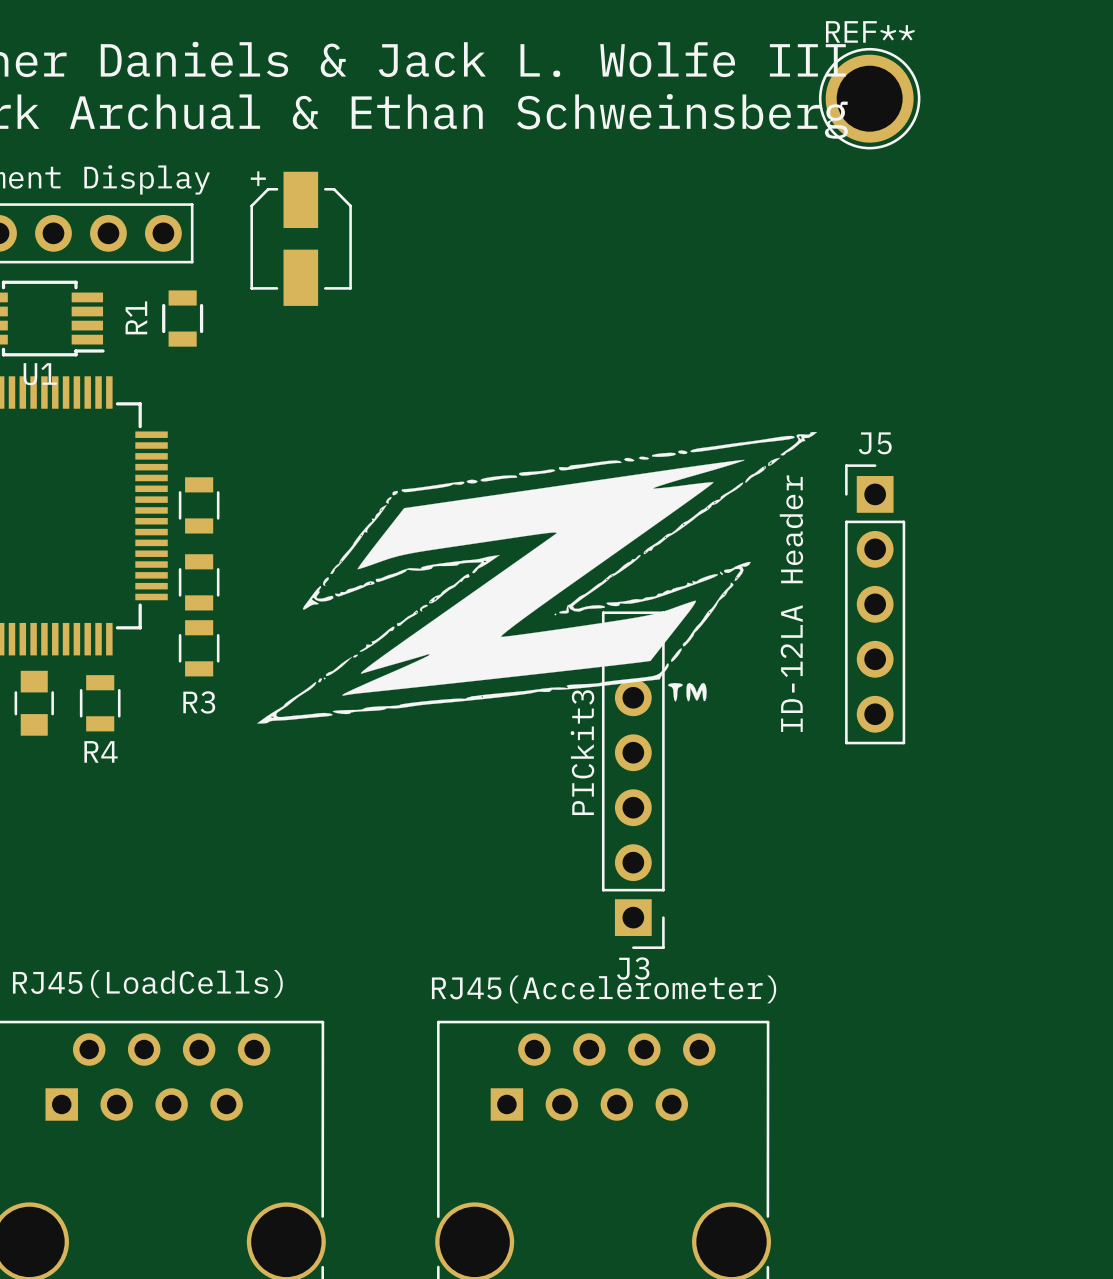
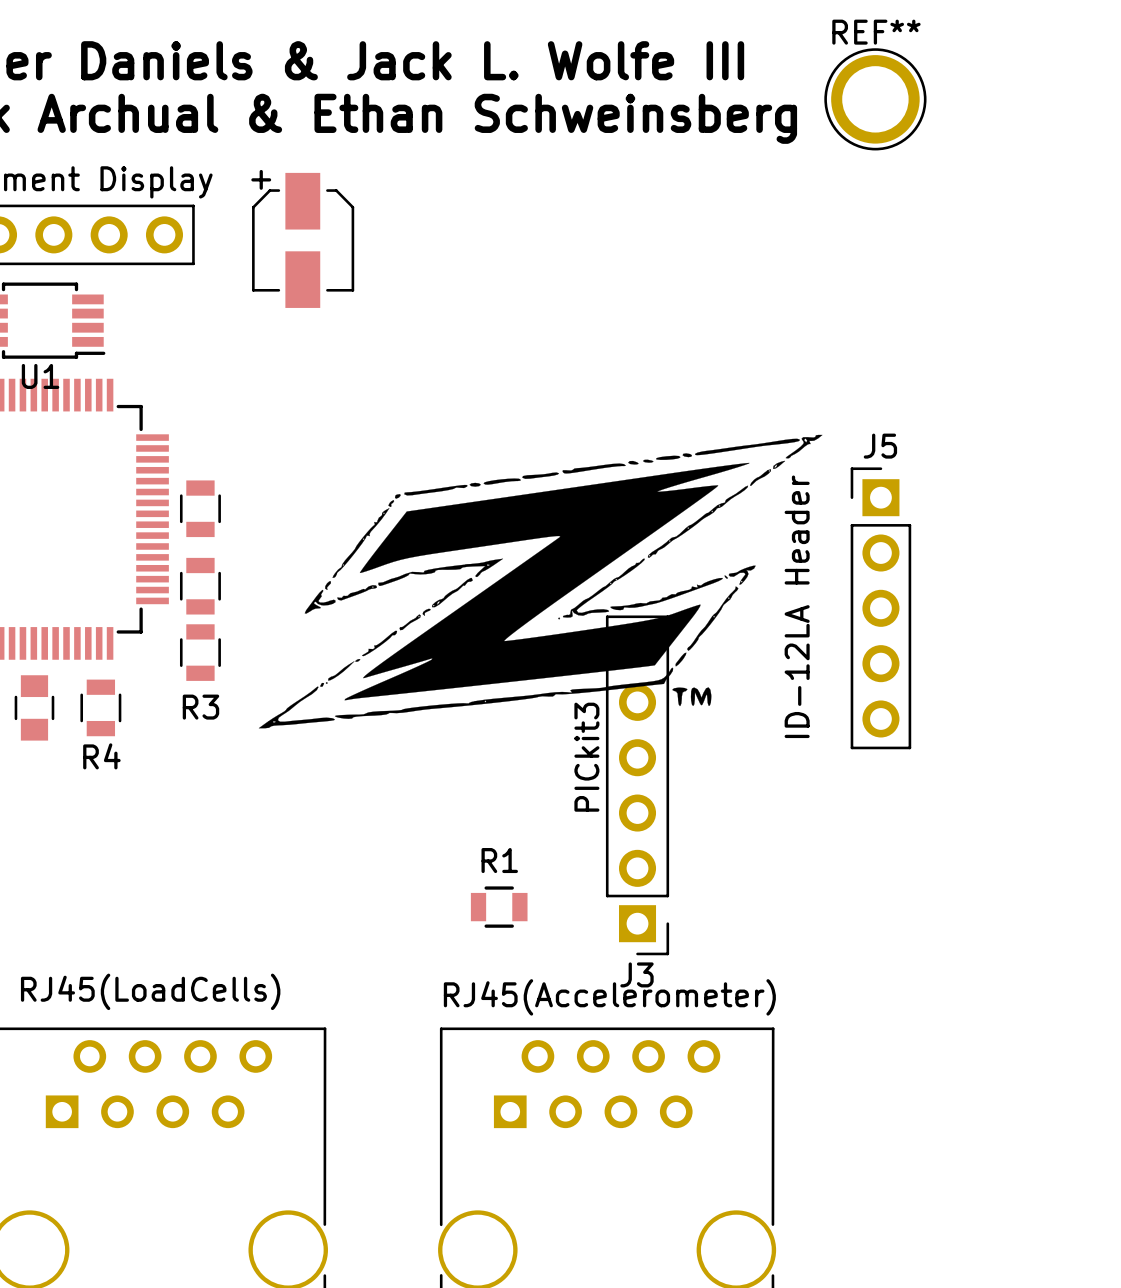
R1 rotation: 0° (182, 318) -> 90° clockwise (499, 907)
R1 position: (182, 318) -> (499, 907)

